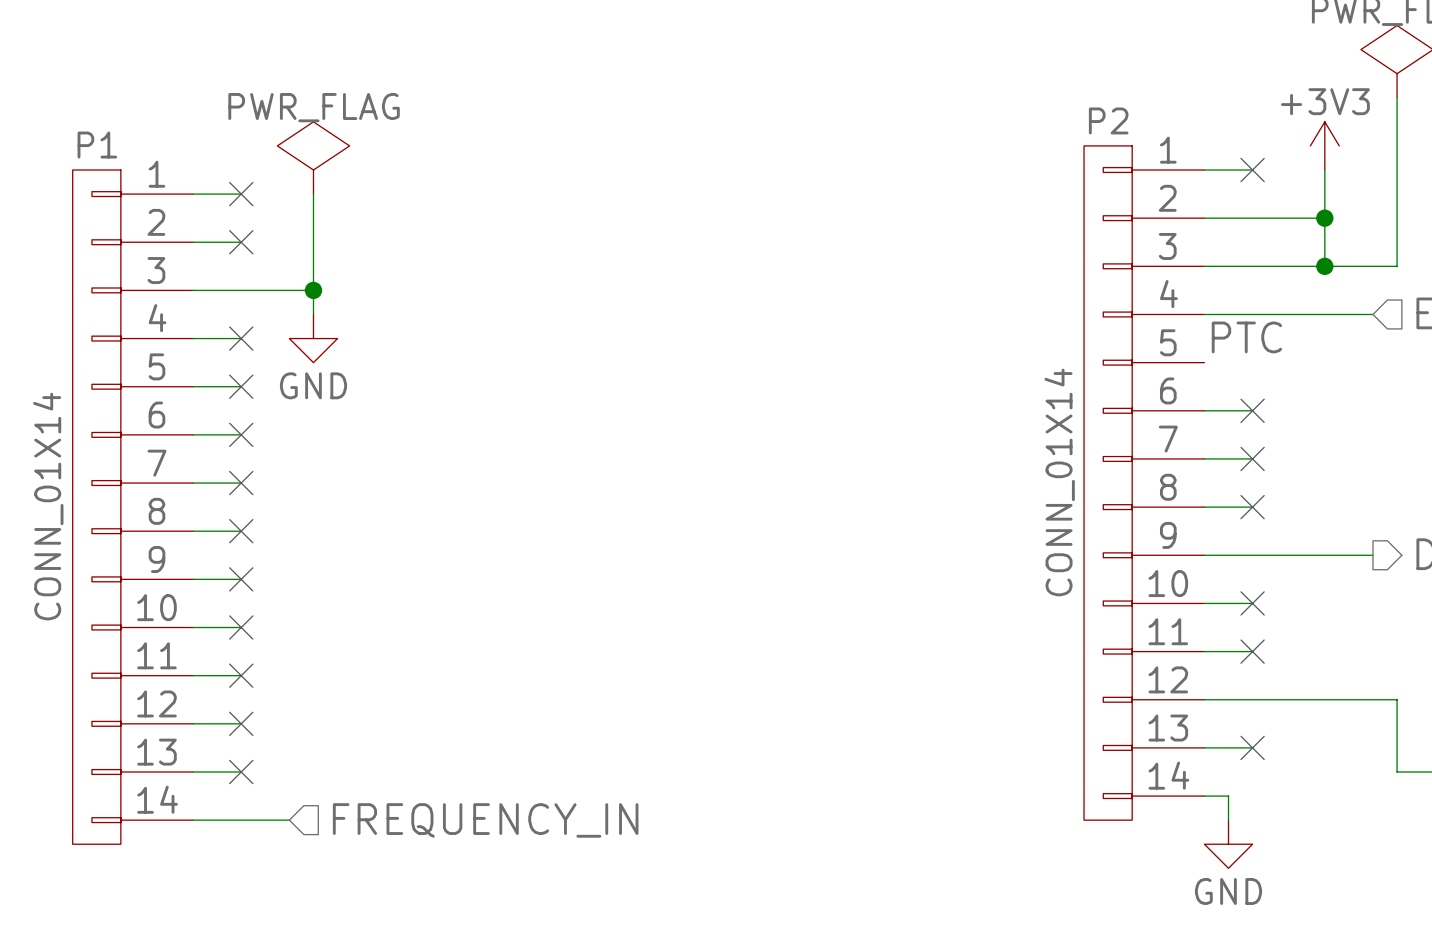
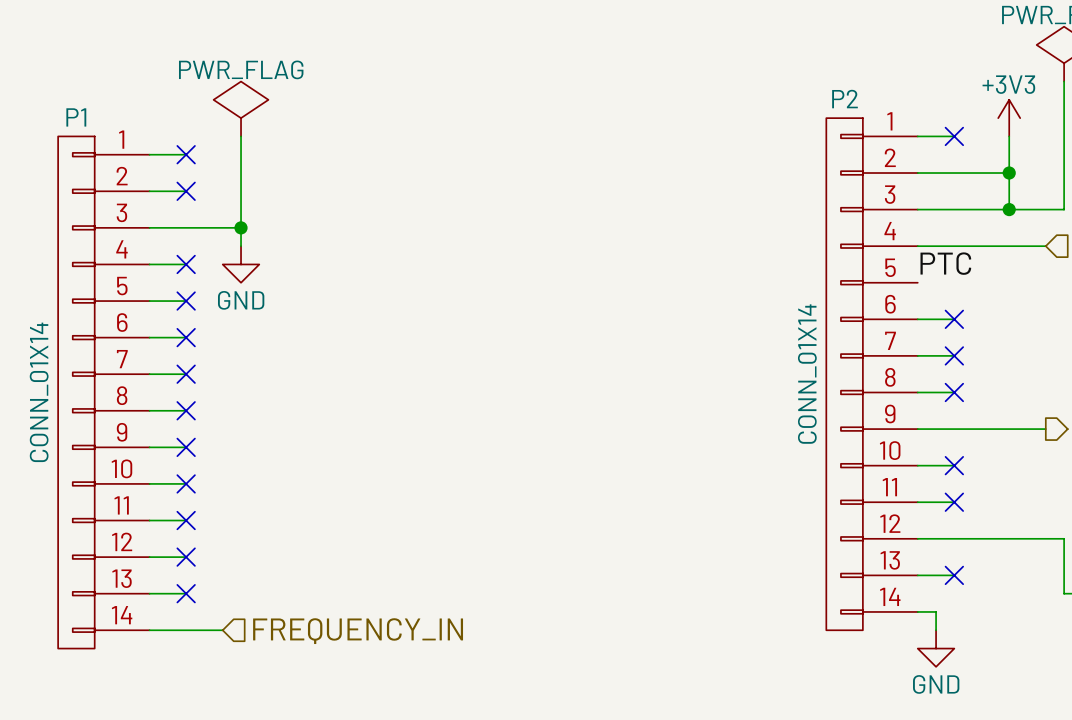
power symbol position: PWR_FLAG (313, 157) -> PWR_FLAG (241, 108)

